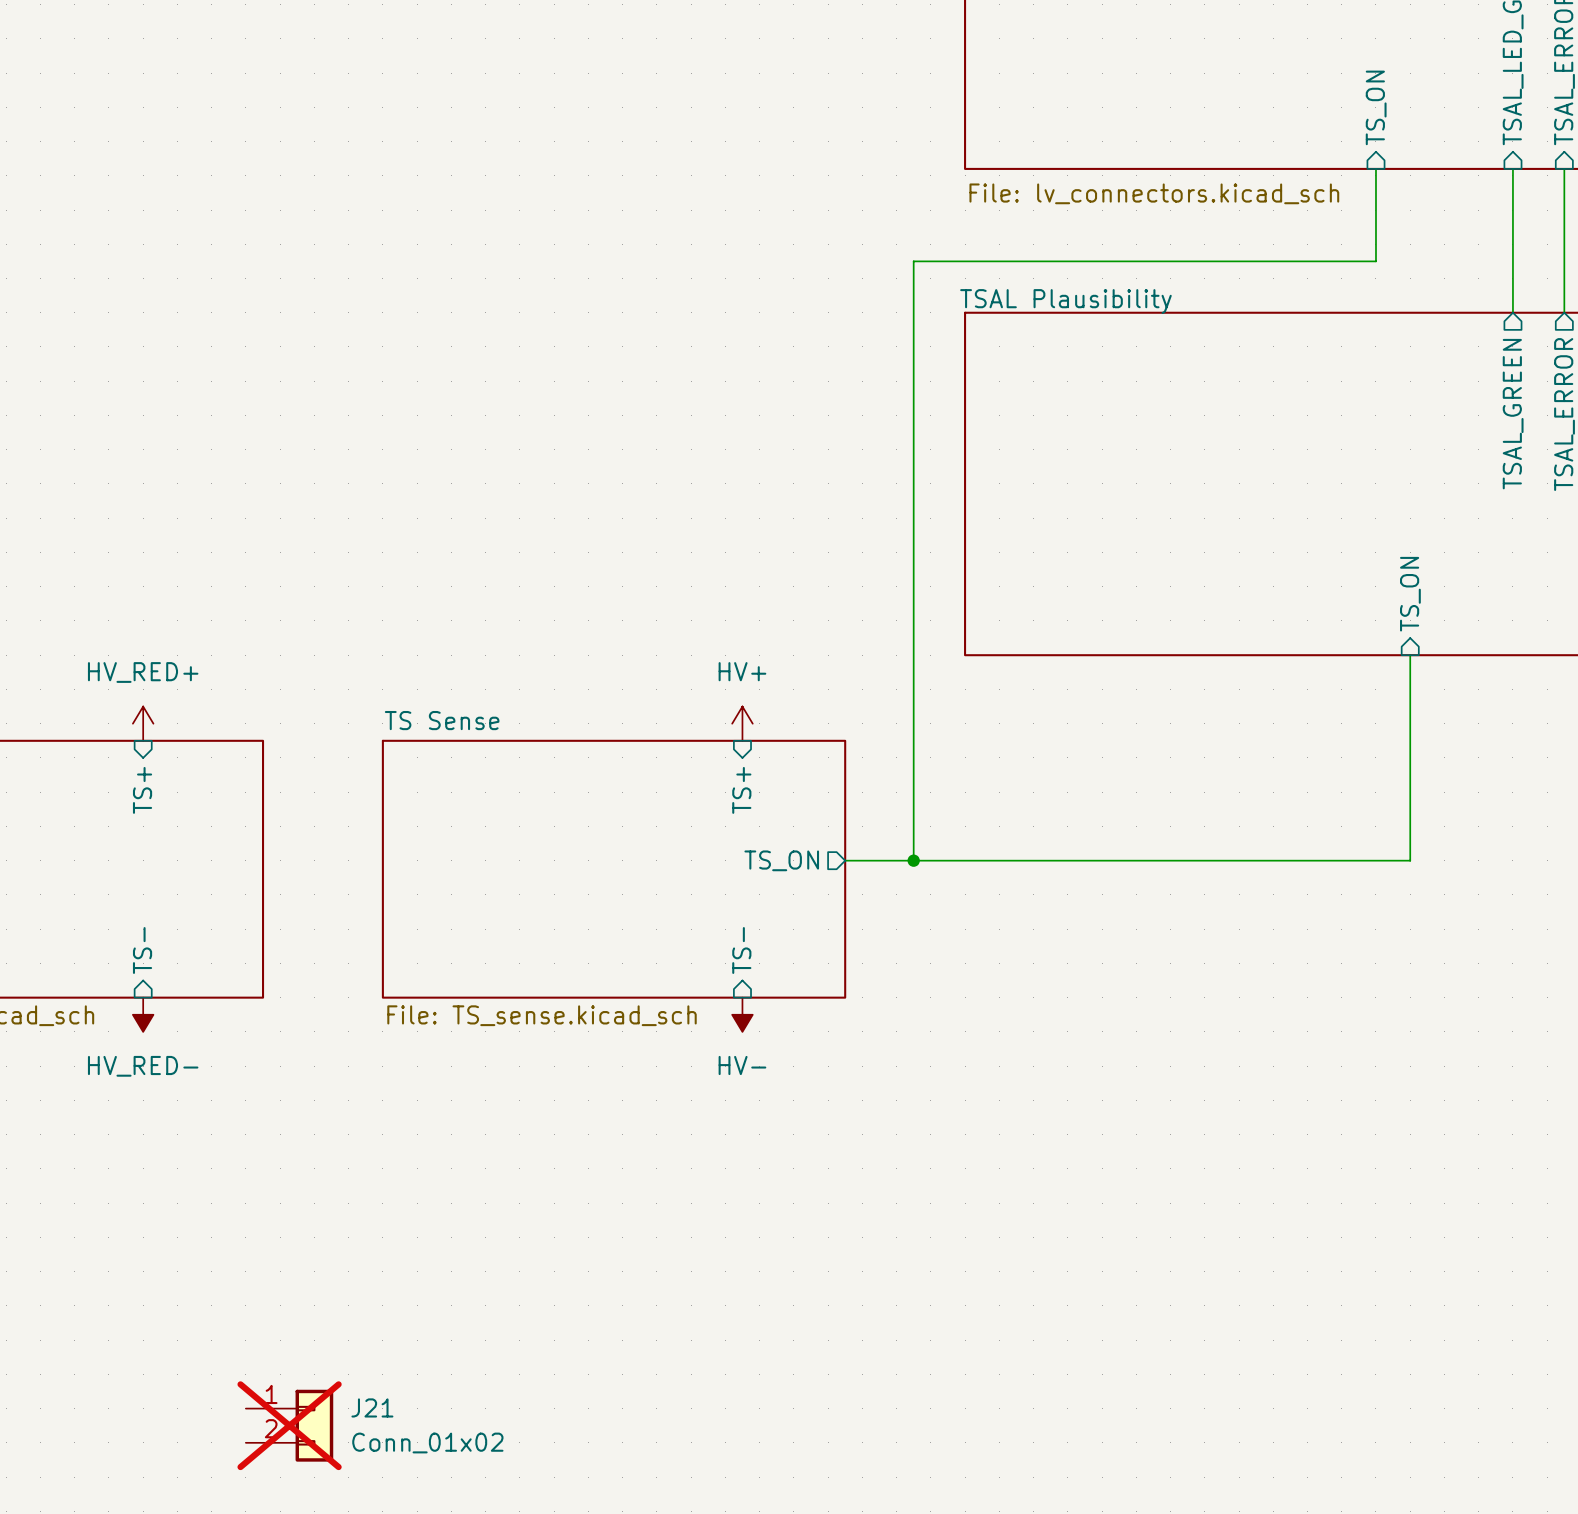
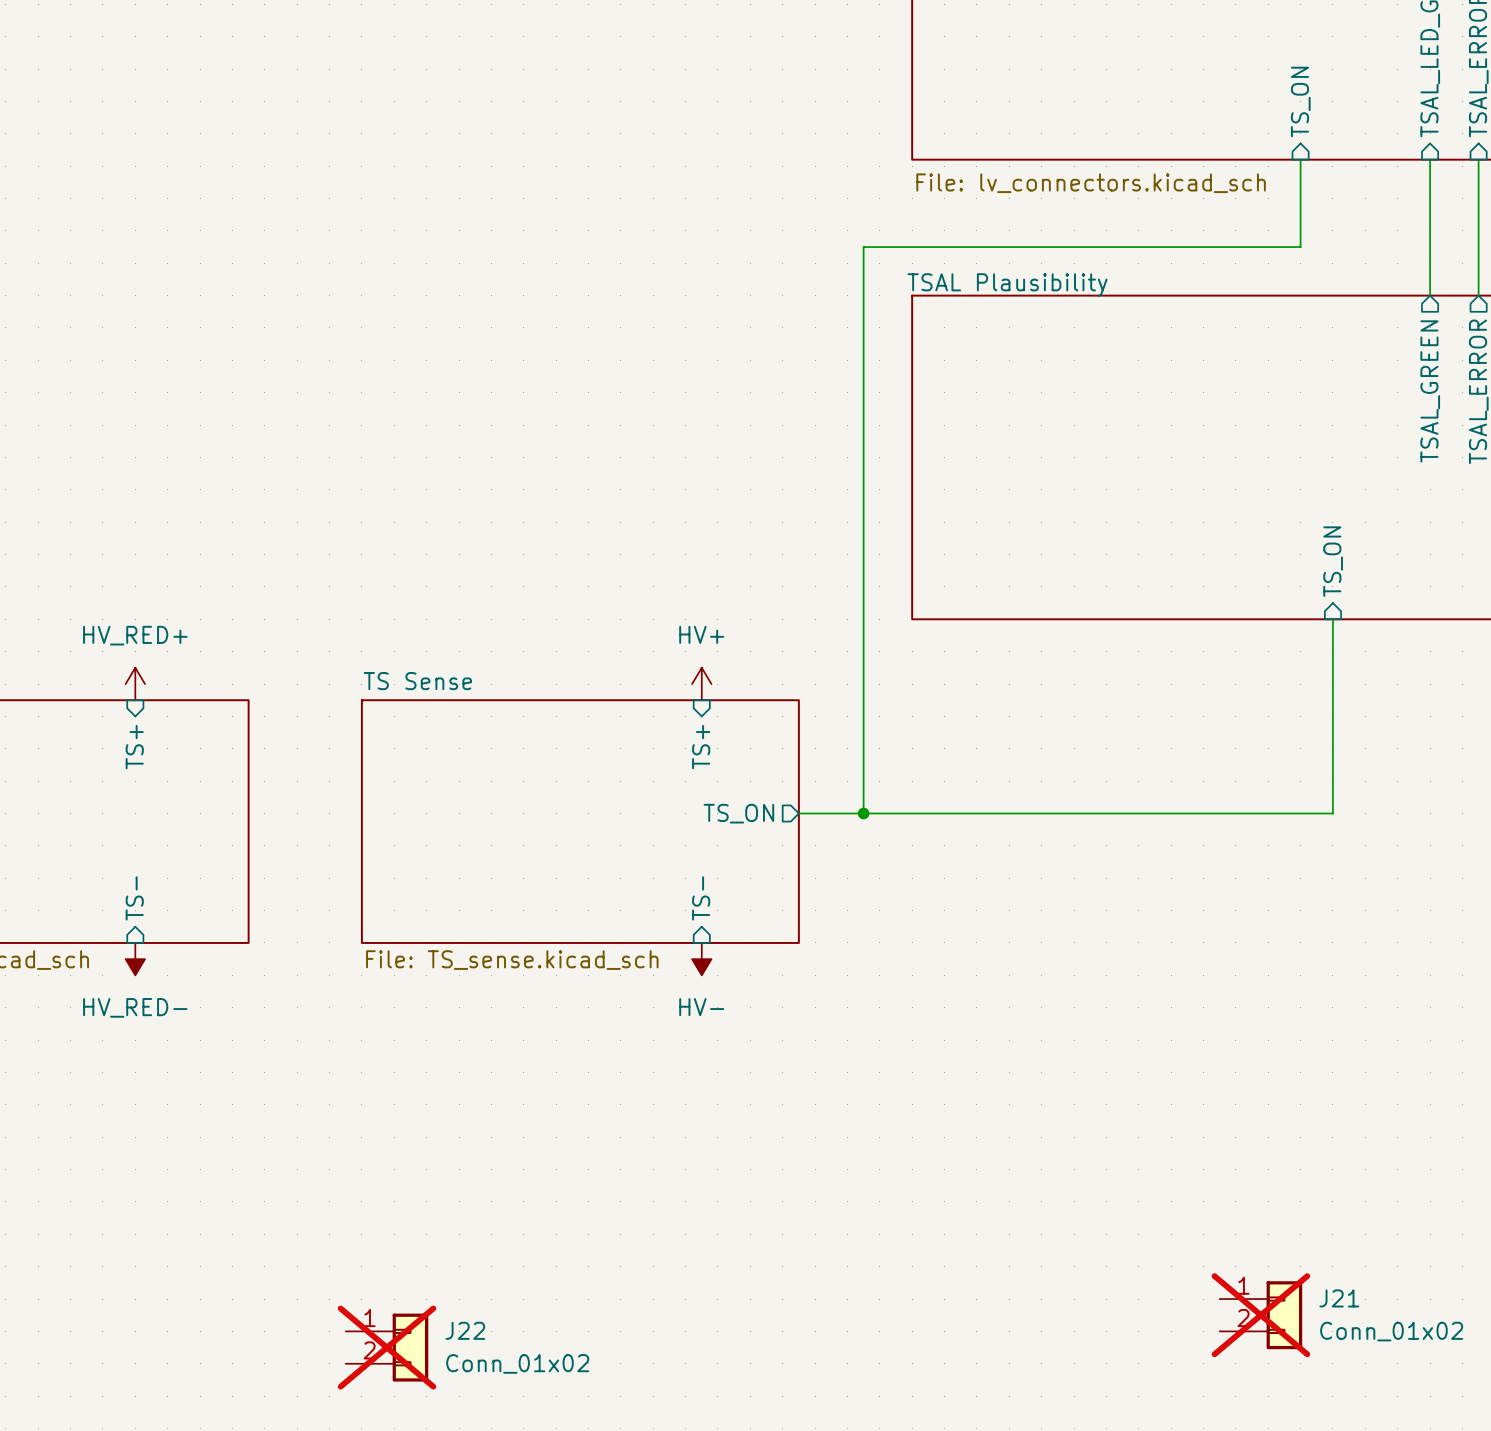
J21 position: (289, 1425) -> (1260, 1315)
J22: none -> Conn_01x02 (386, 1347)

